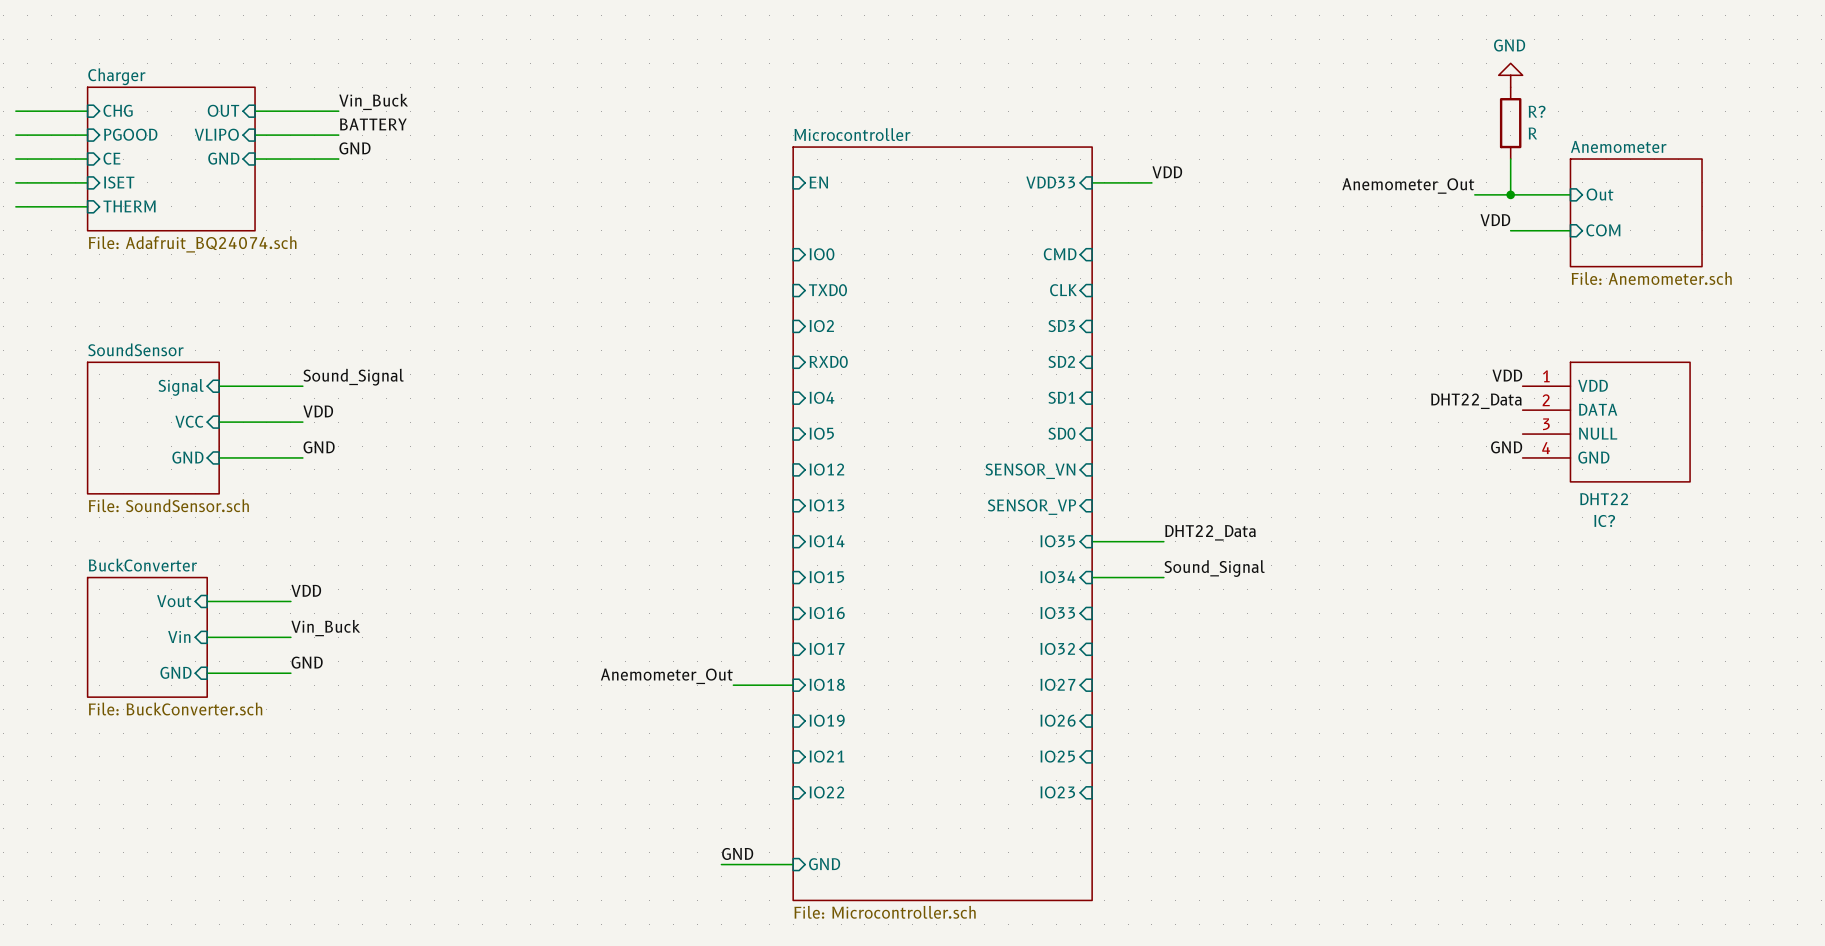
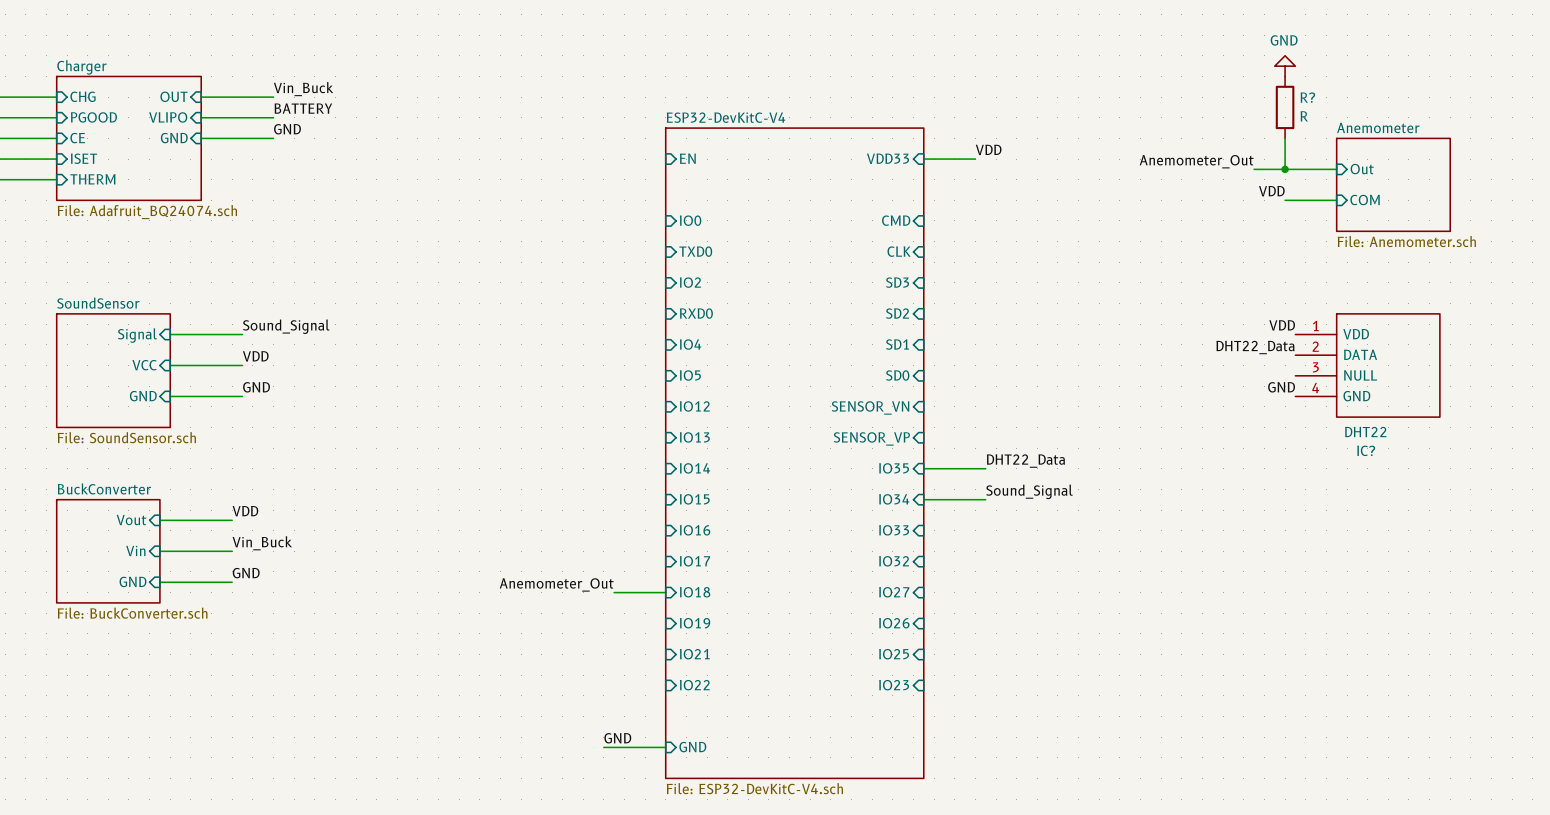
sheet Microcontroller name: Microcontroller (852, 134) -> ESP32-DevKitC-V4 (726, 117)
sheet Microcontroller value: File: Microcontroller.sch (885, 912) -> File: ESP32-DevKitC-V4.sch (754, 788)

